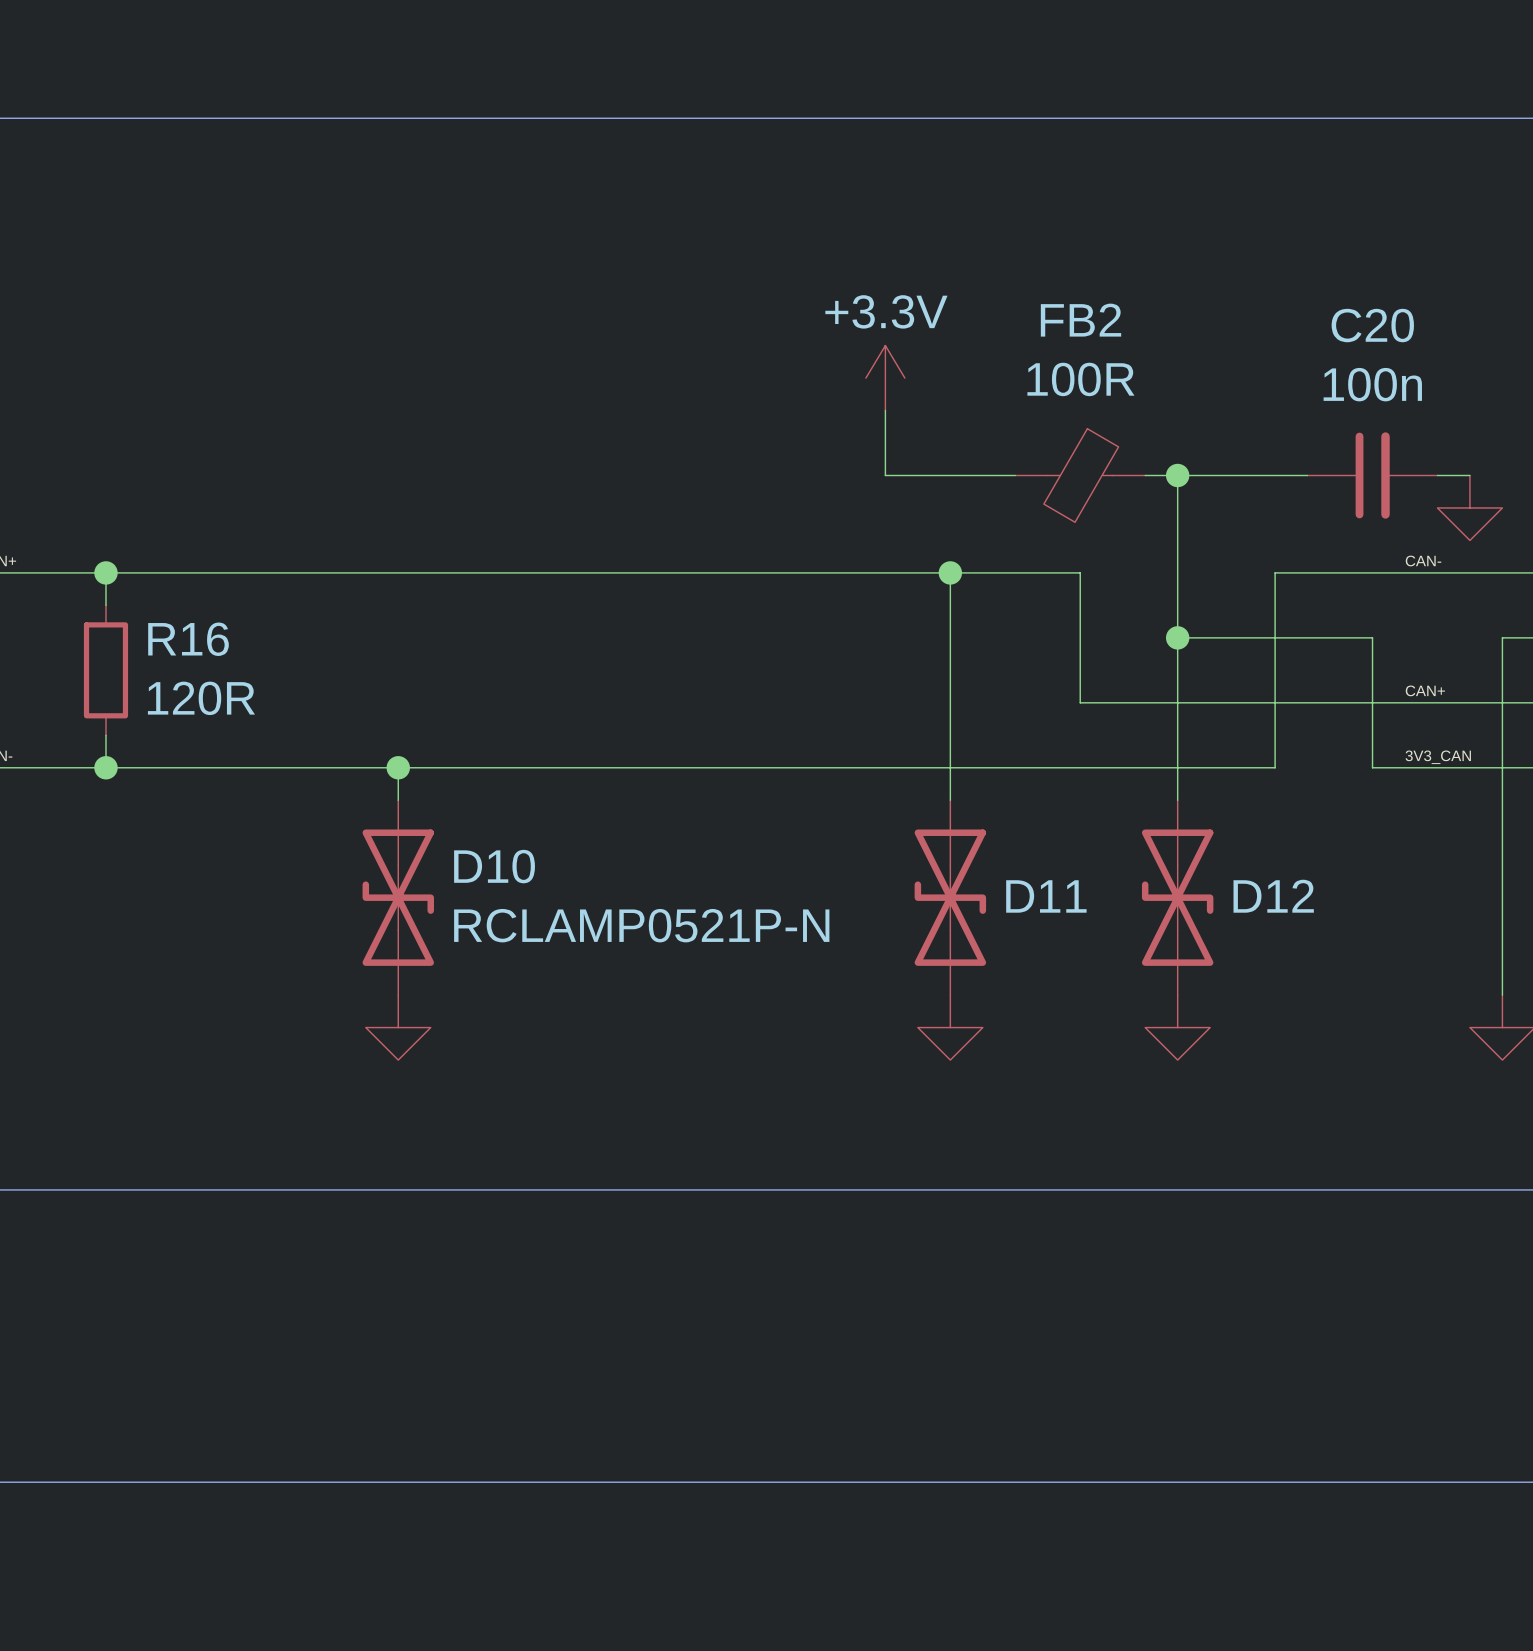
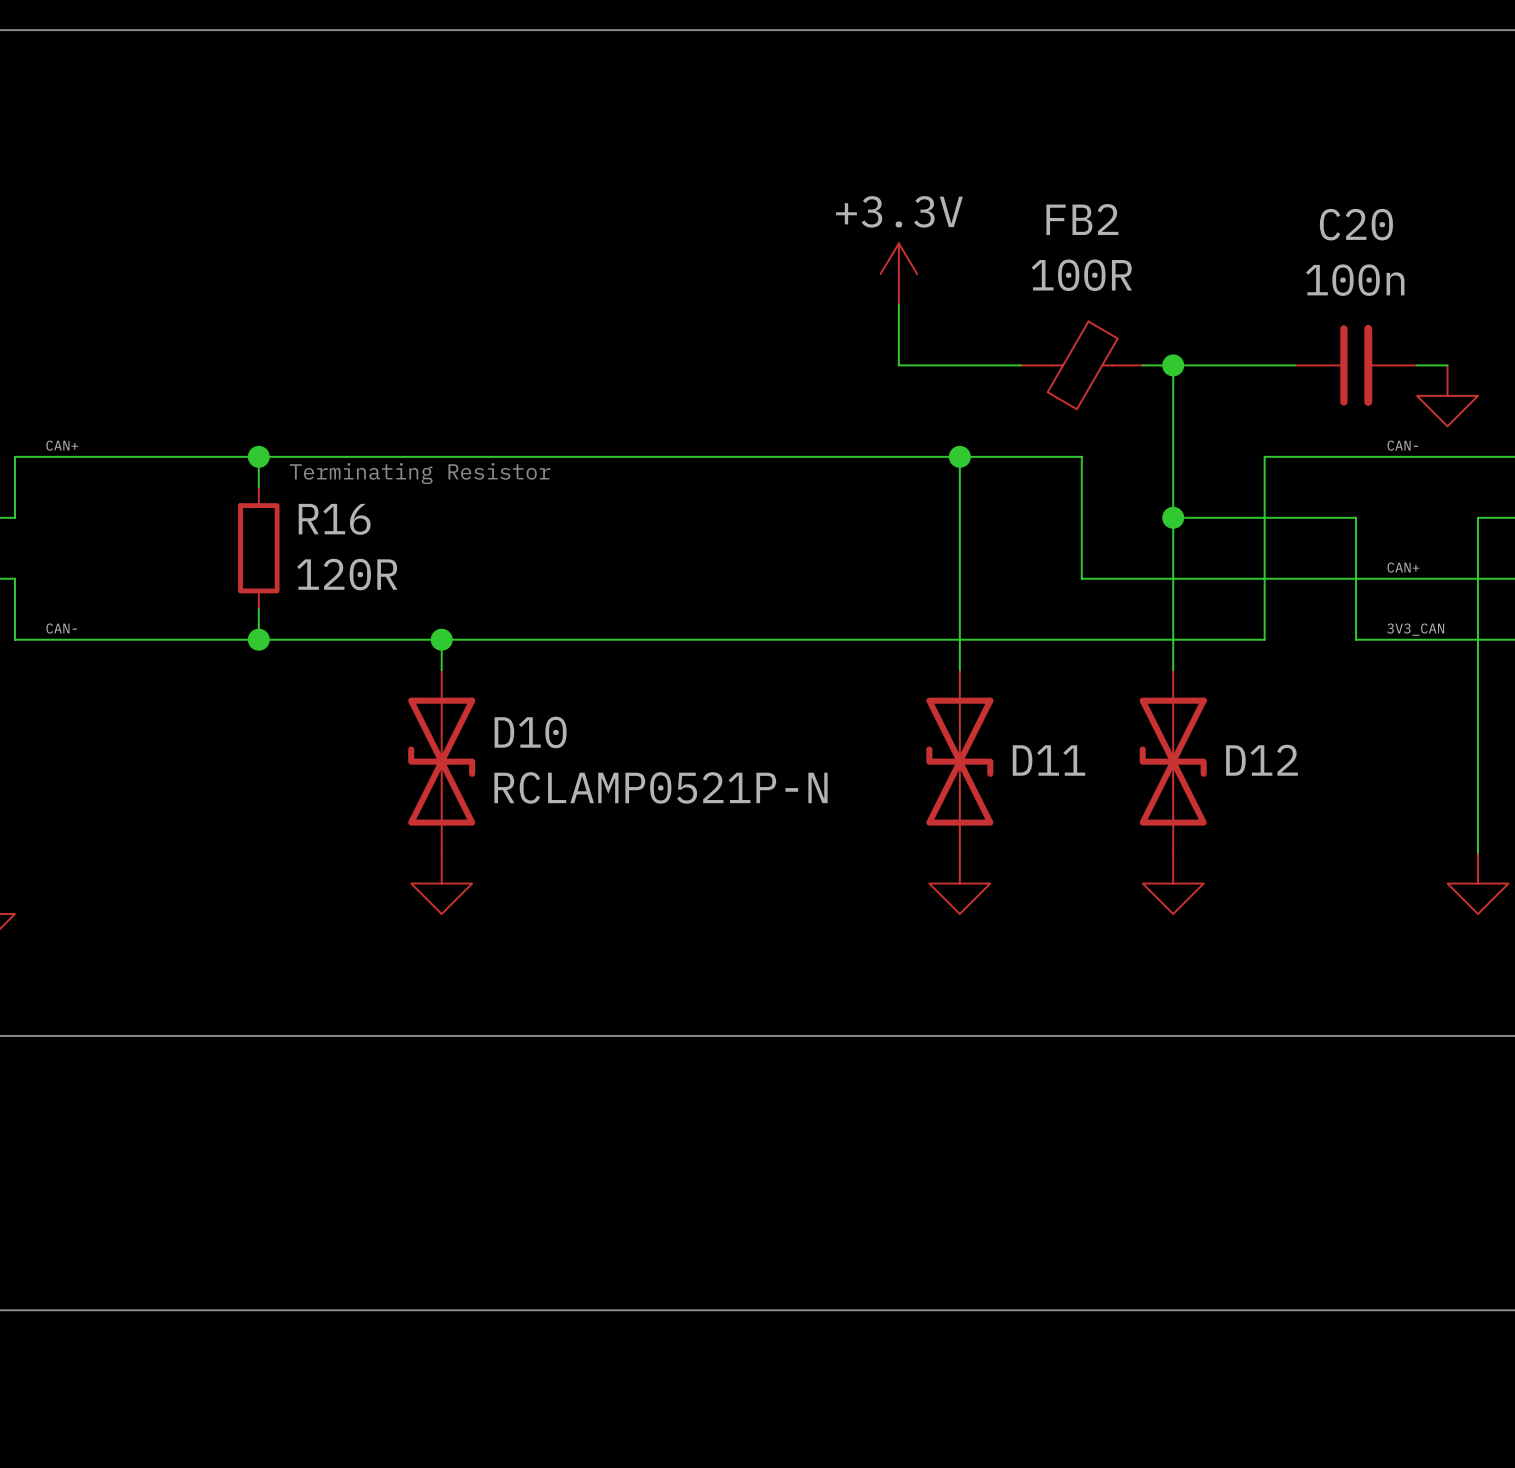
wire: (105, 572) (105, 605) -> (258, 456) (258, 487)
junction position: (105, 572) -> (258, 456)
text: none -> Terminating Resistor (420, 473)
R16 position: (105, 670) -> (258, 548)
wire: (105, 735) (105, 767) -> (258, 609) (258, 639)
junction position: (105, 767) -> (258, 639)

